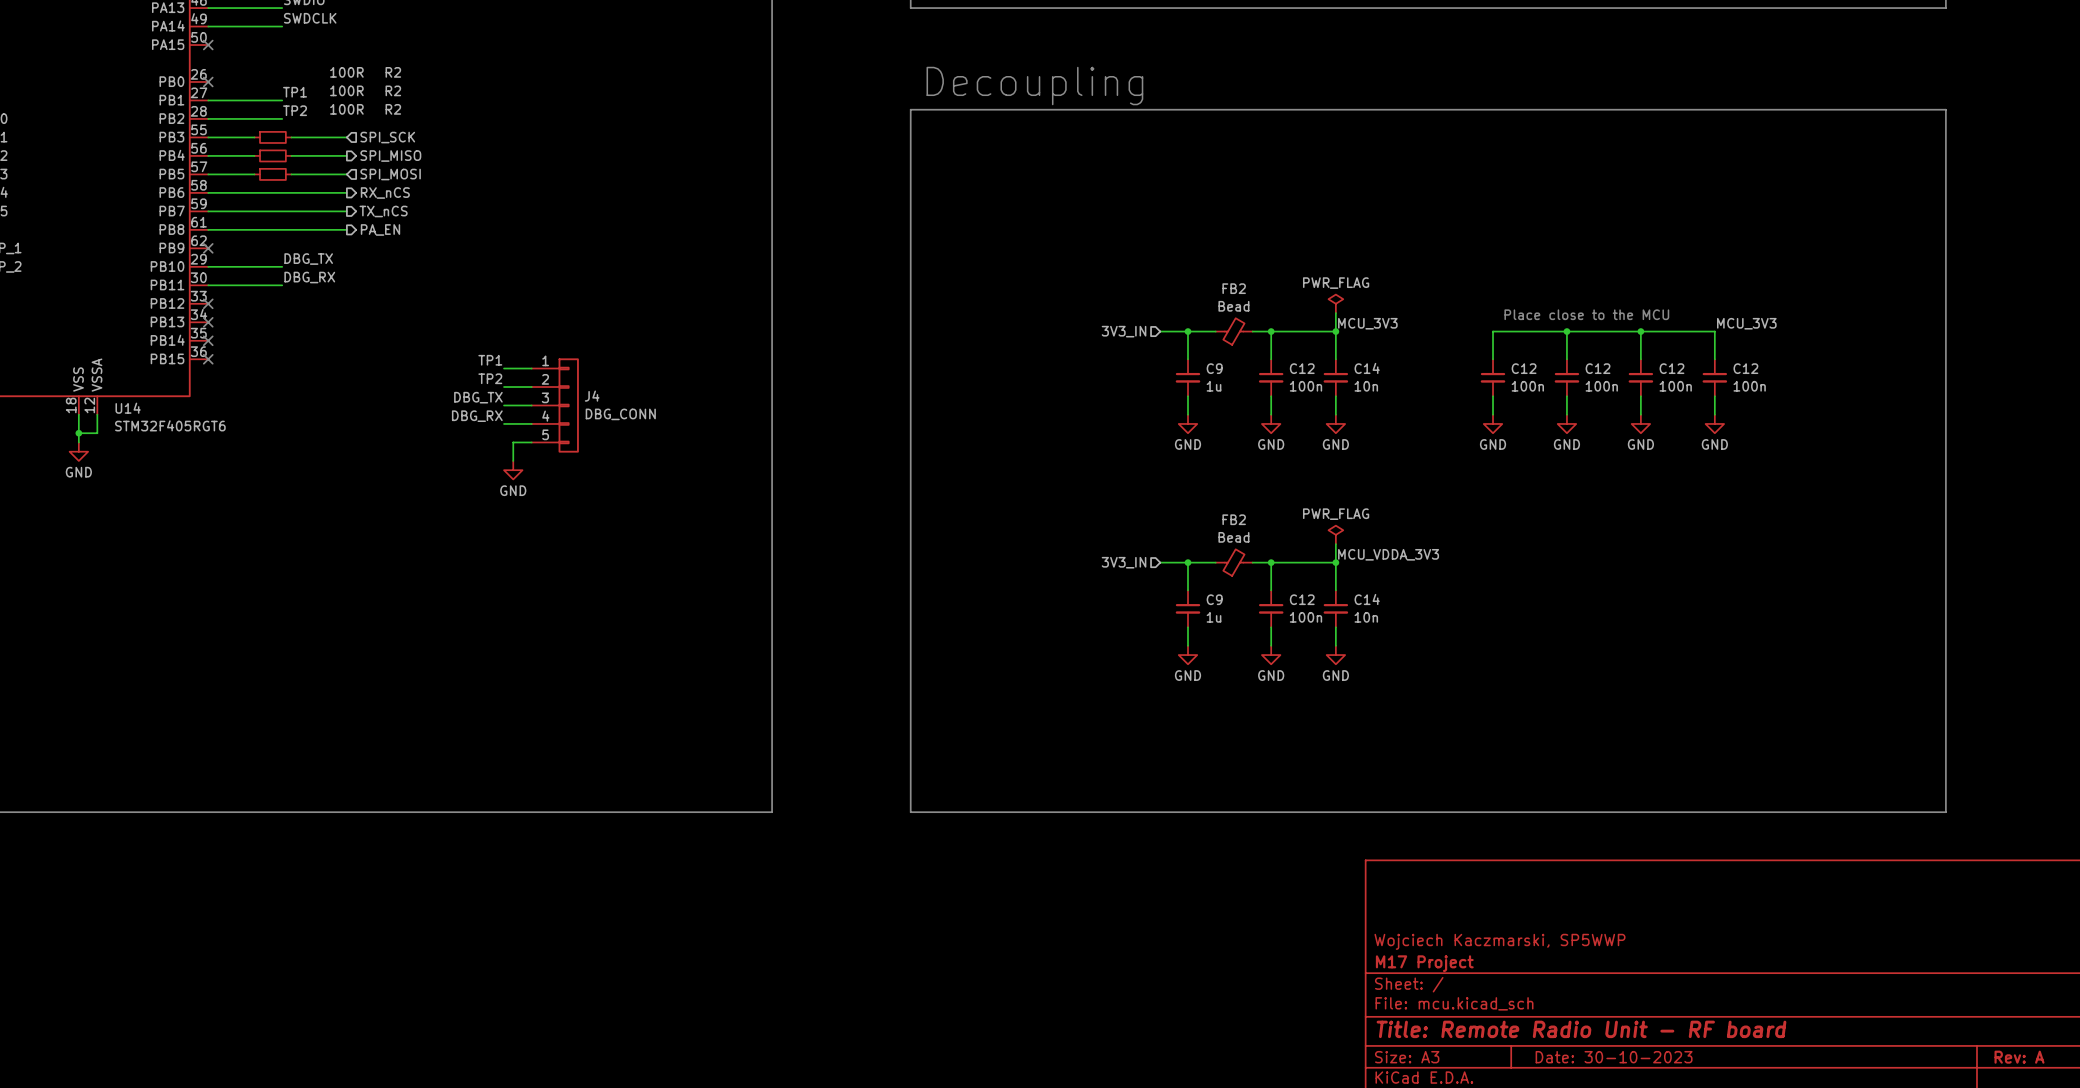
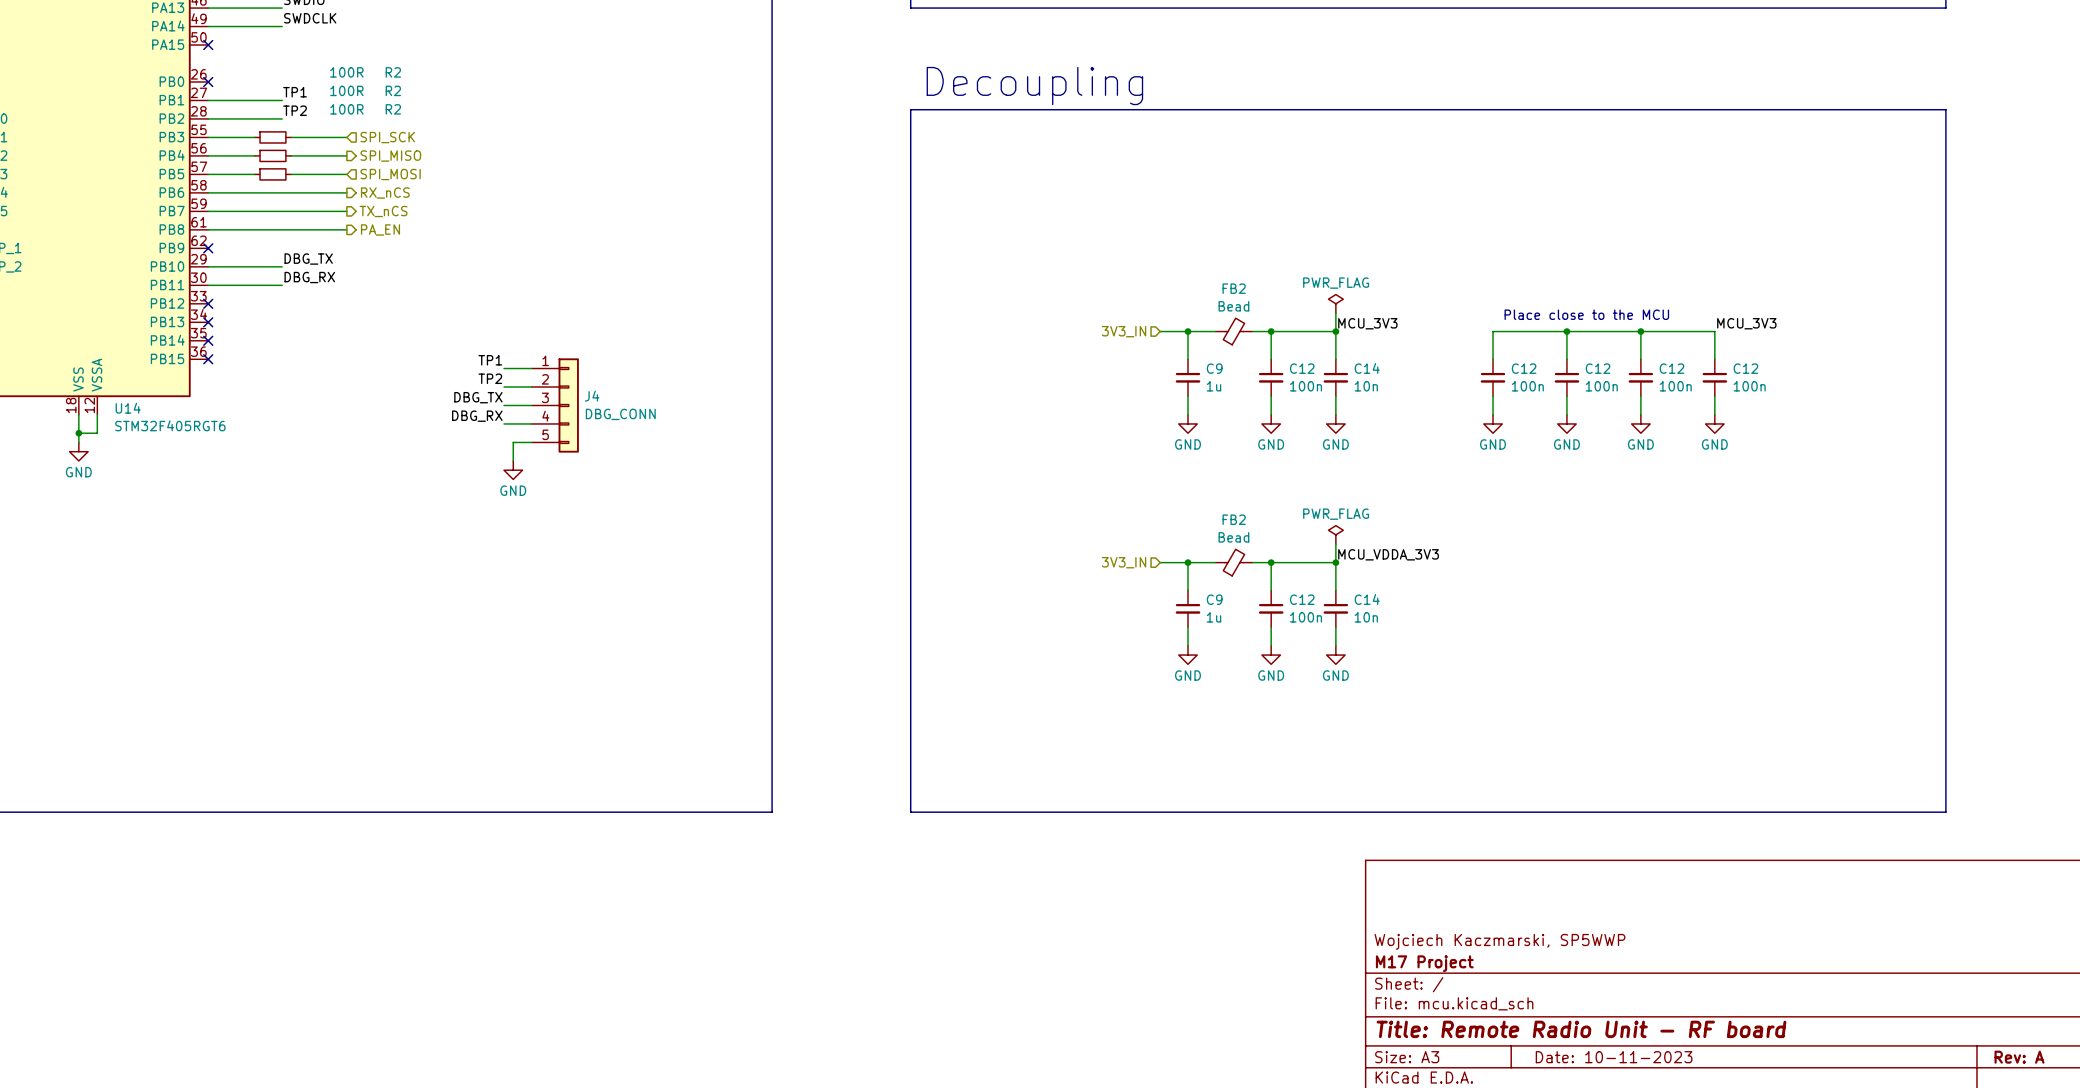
title block: Date: 30-10-2023 (1614, 1057) -> Date: 10-11-2023 (1614, 1057)

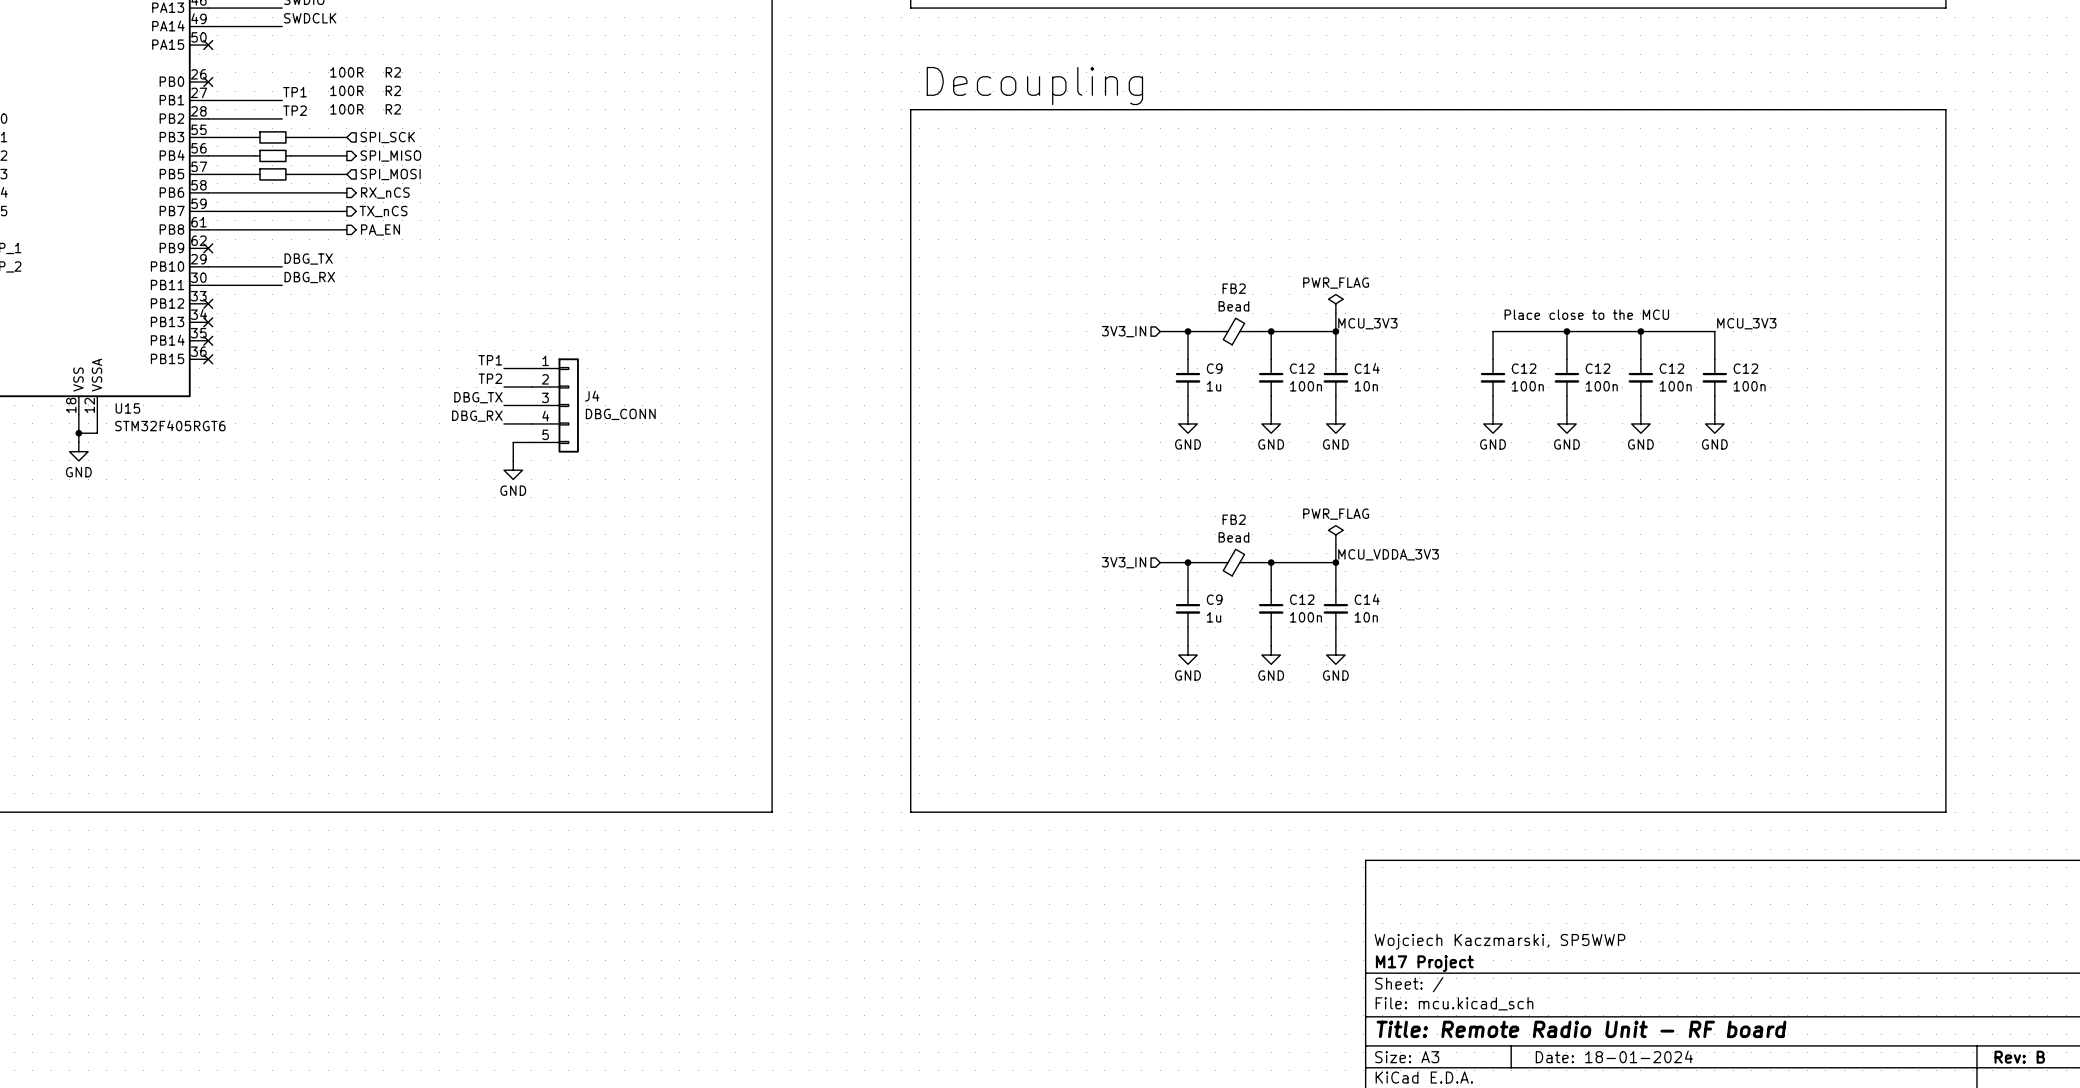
U14 name: U14 (128, 408) -> U15 (127, 408)
title block: Date: 10-11-2023 (1614, 1057) -> Date: 18-01-2024 (1614, 1056)
title block: Rev: A (2019, 1057) -> Rev: B (2019, 1057)

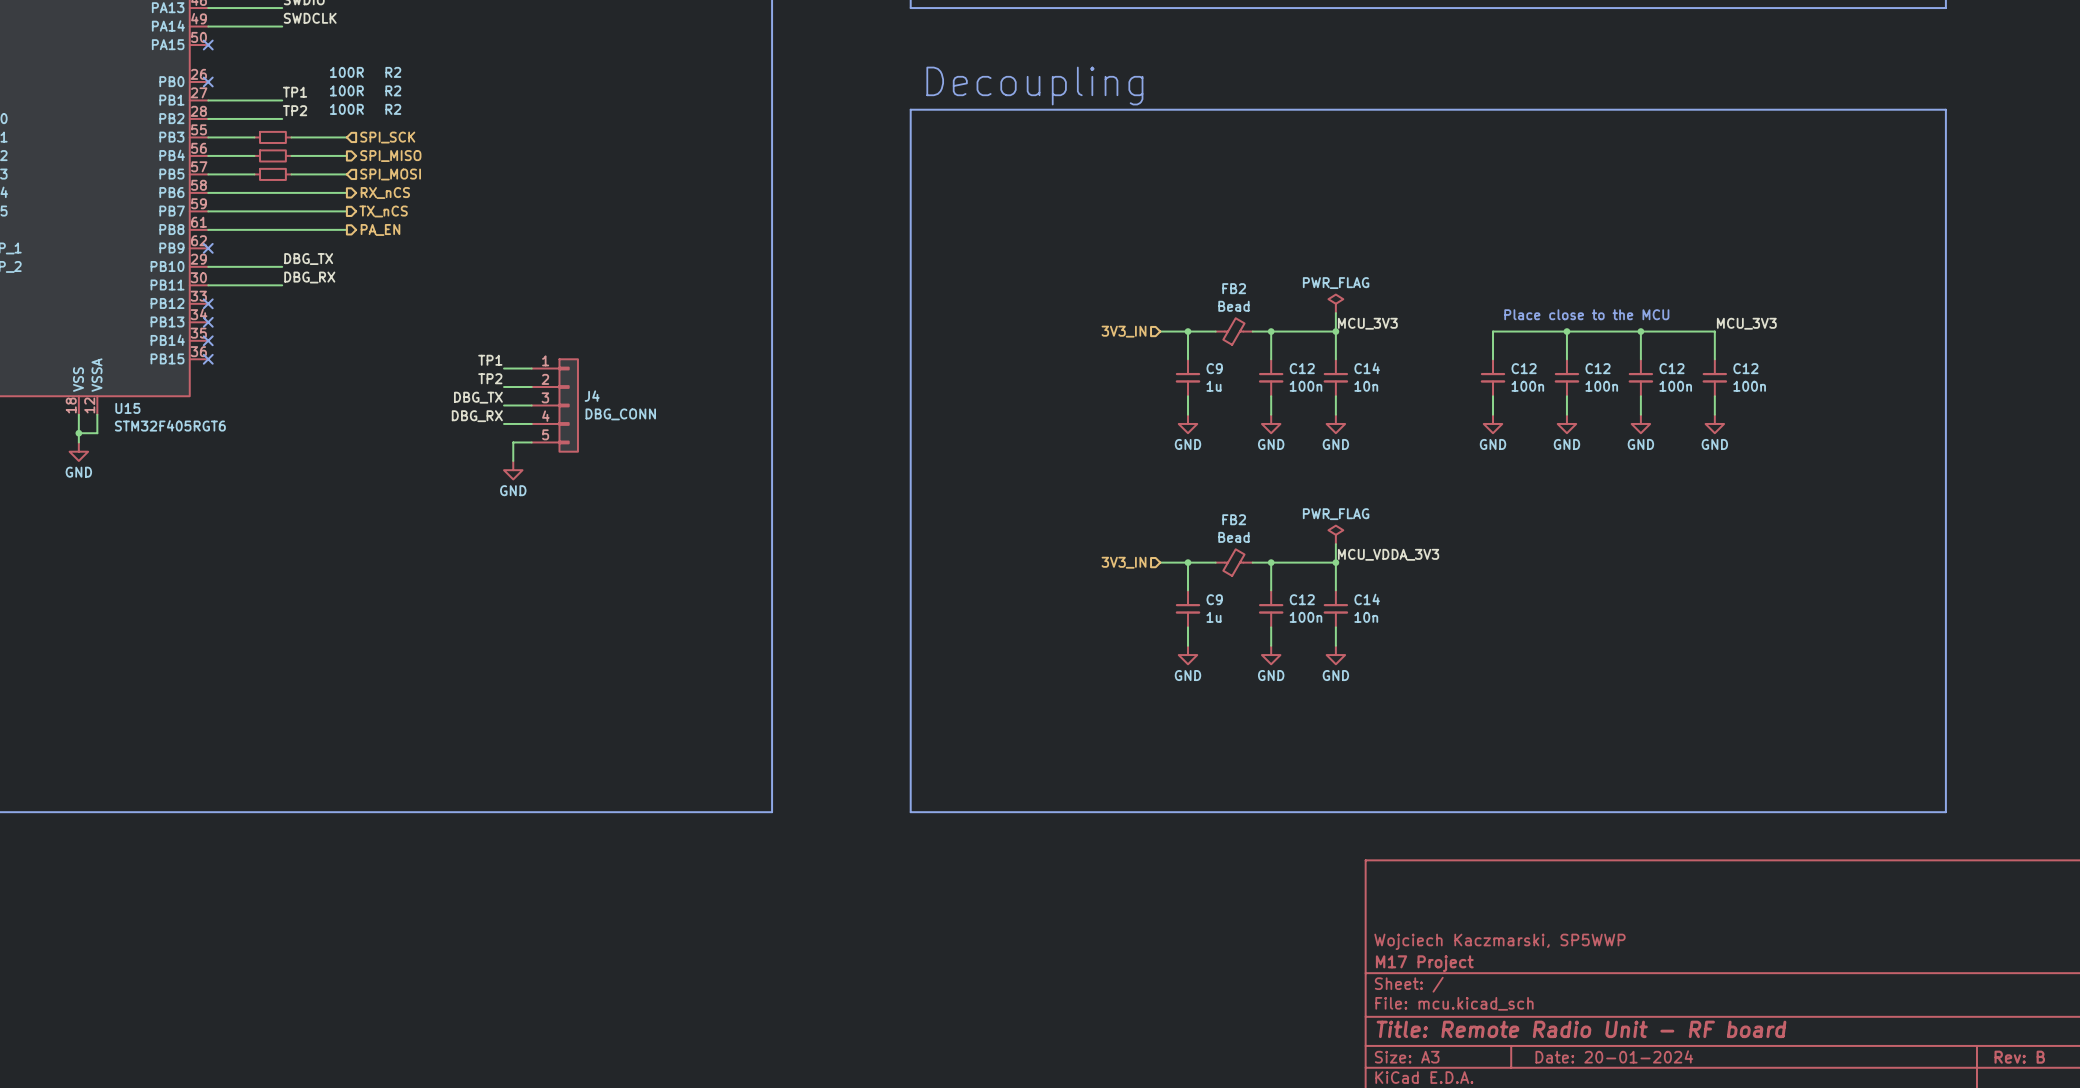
title block: Date: 18-01-2024 (1614, 1056) -> Date: 20-01-2024 (1614, 1056)

